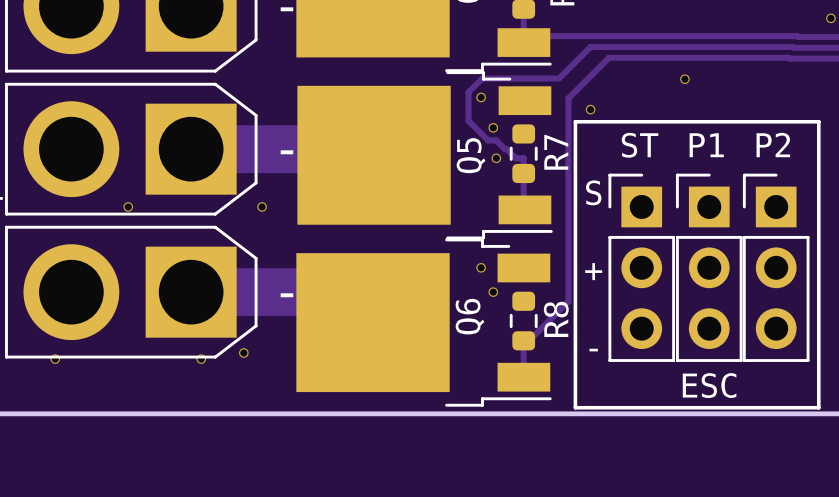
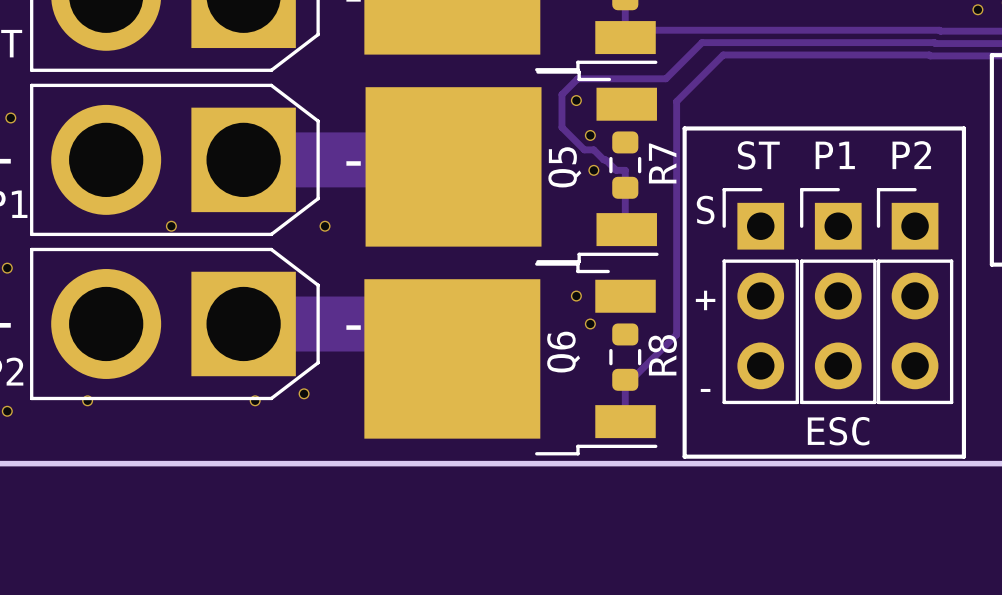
via: (684, 79) -> none
via: (590, 109) -> none

